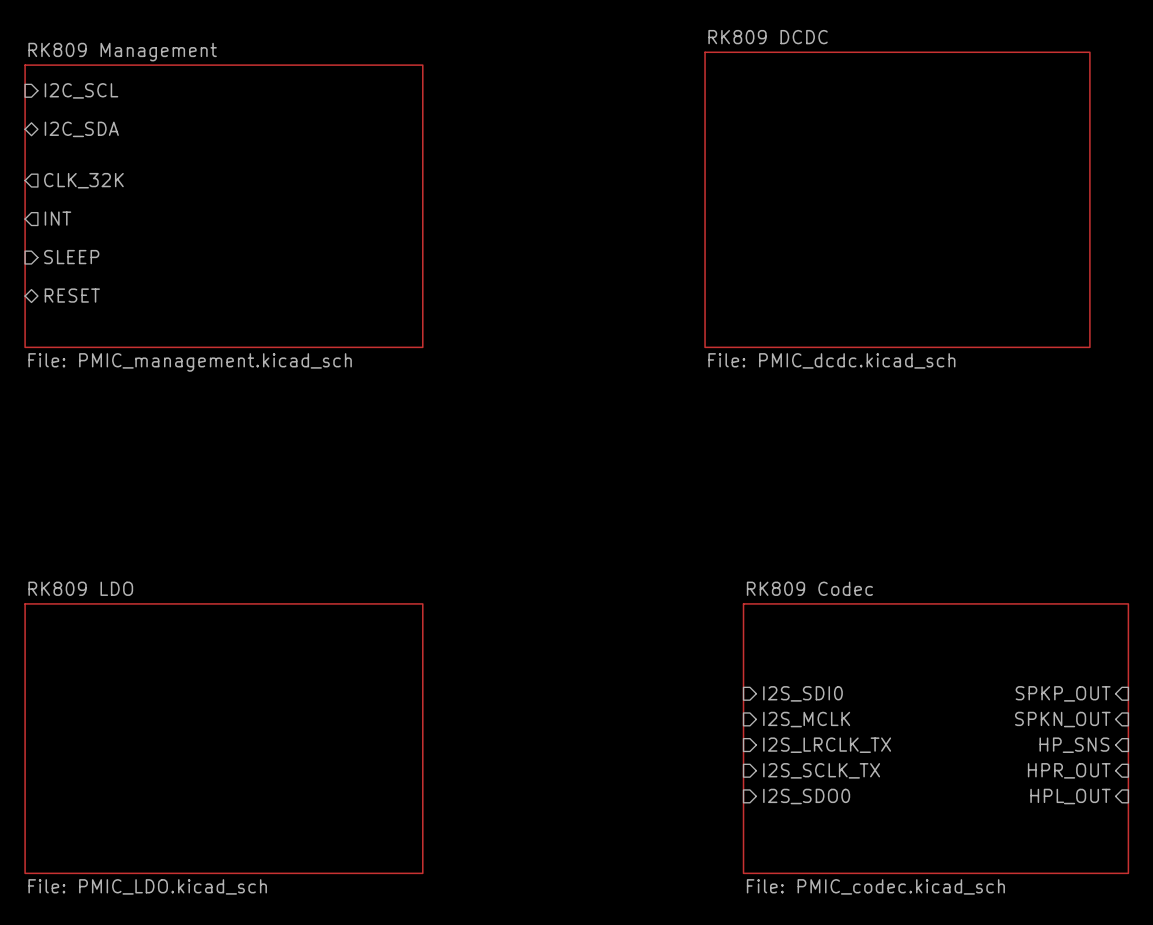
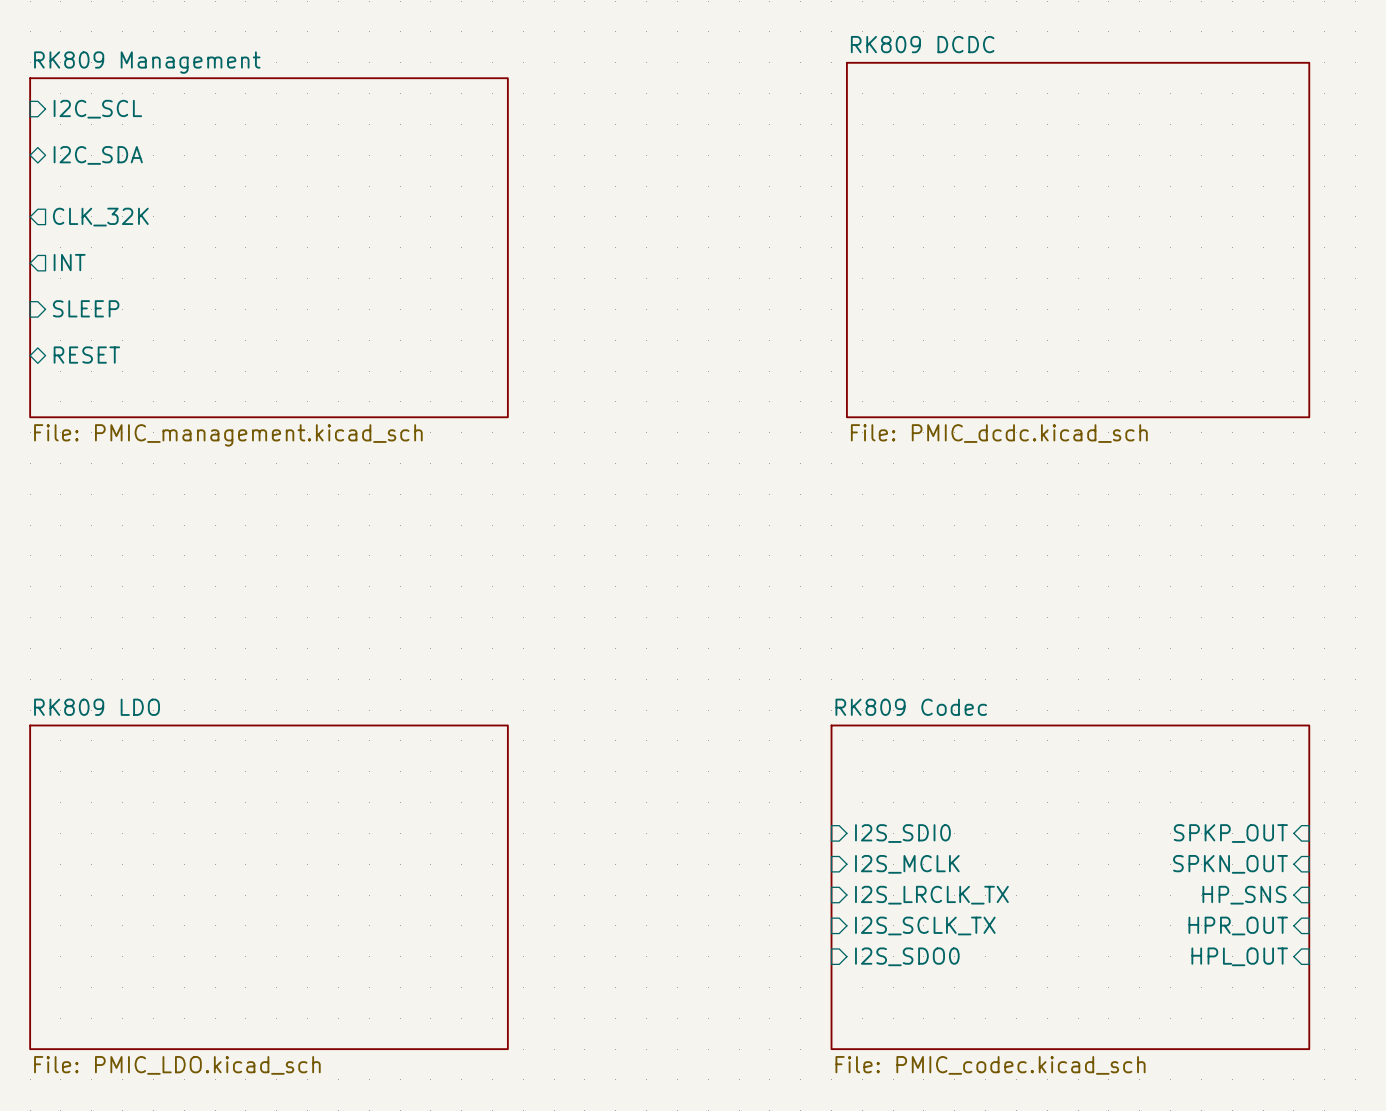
sheet RK809 Codec shape: [742, 603, 1130, 875] -> [830, 724, 1311, 1051]
sheet pin position: I2S_SDI0 (802, 693) -> I2S_SDI0 (902, 833)
sheet pin position: SPKP_OUT (1063, 693) -> SPKP_OUT (1230, 833)
sheet pin position: I2S_MCLK (806, 719) -> I2S_MCLK (907, 864)
sheet pin position: SPKN_OUT (1062, 719) -> SPKN_OUT (1230, 864)
sheet pin position: I2S_LRCLK_TX (827, 745) -> I2S_LRCLK_TX (931, 895)
sheet pin position: HP_SNS (1074, 745) -> HP_SNS (1244, 895)
sheet pin position: I2S_SCLK_TX (821, 770) -> I2S_SCLK_TX (925, 926)
sheet pin position: HPR_OUT (1069, 770) -> HPR_OUT (1238, 926)
sheet pin position: I2S_SDO0 (806, 796) -> I2S_SDO0 (907, 956)
sheet pin position: HPL_OUT (1070, 796) -> HPL_OUT (1239, 956)

